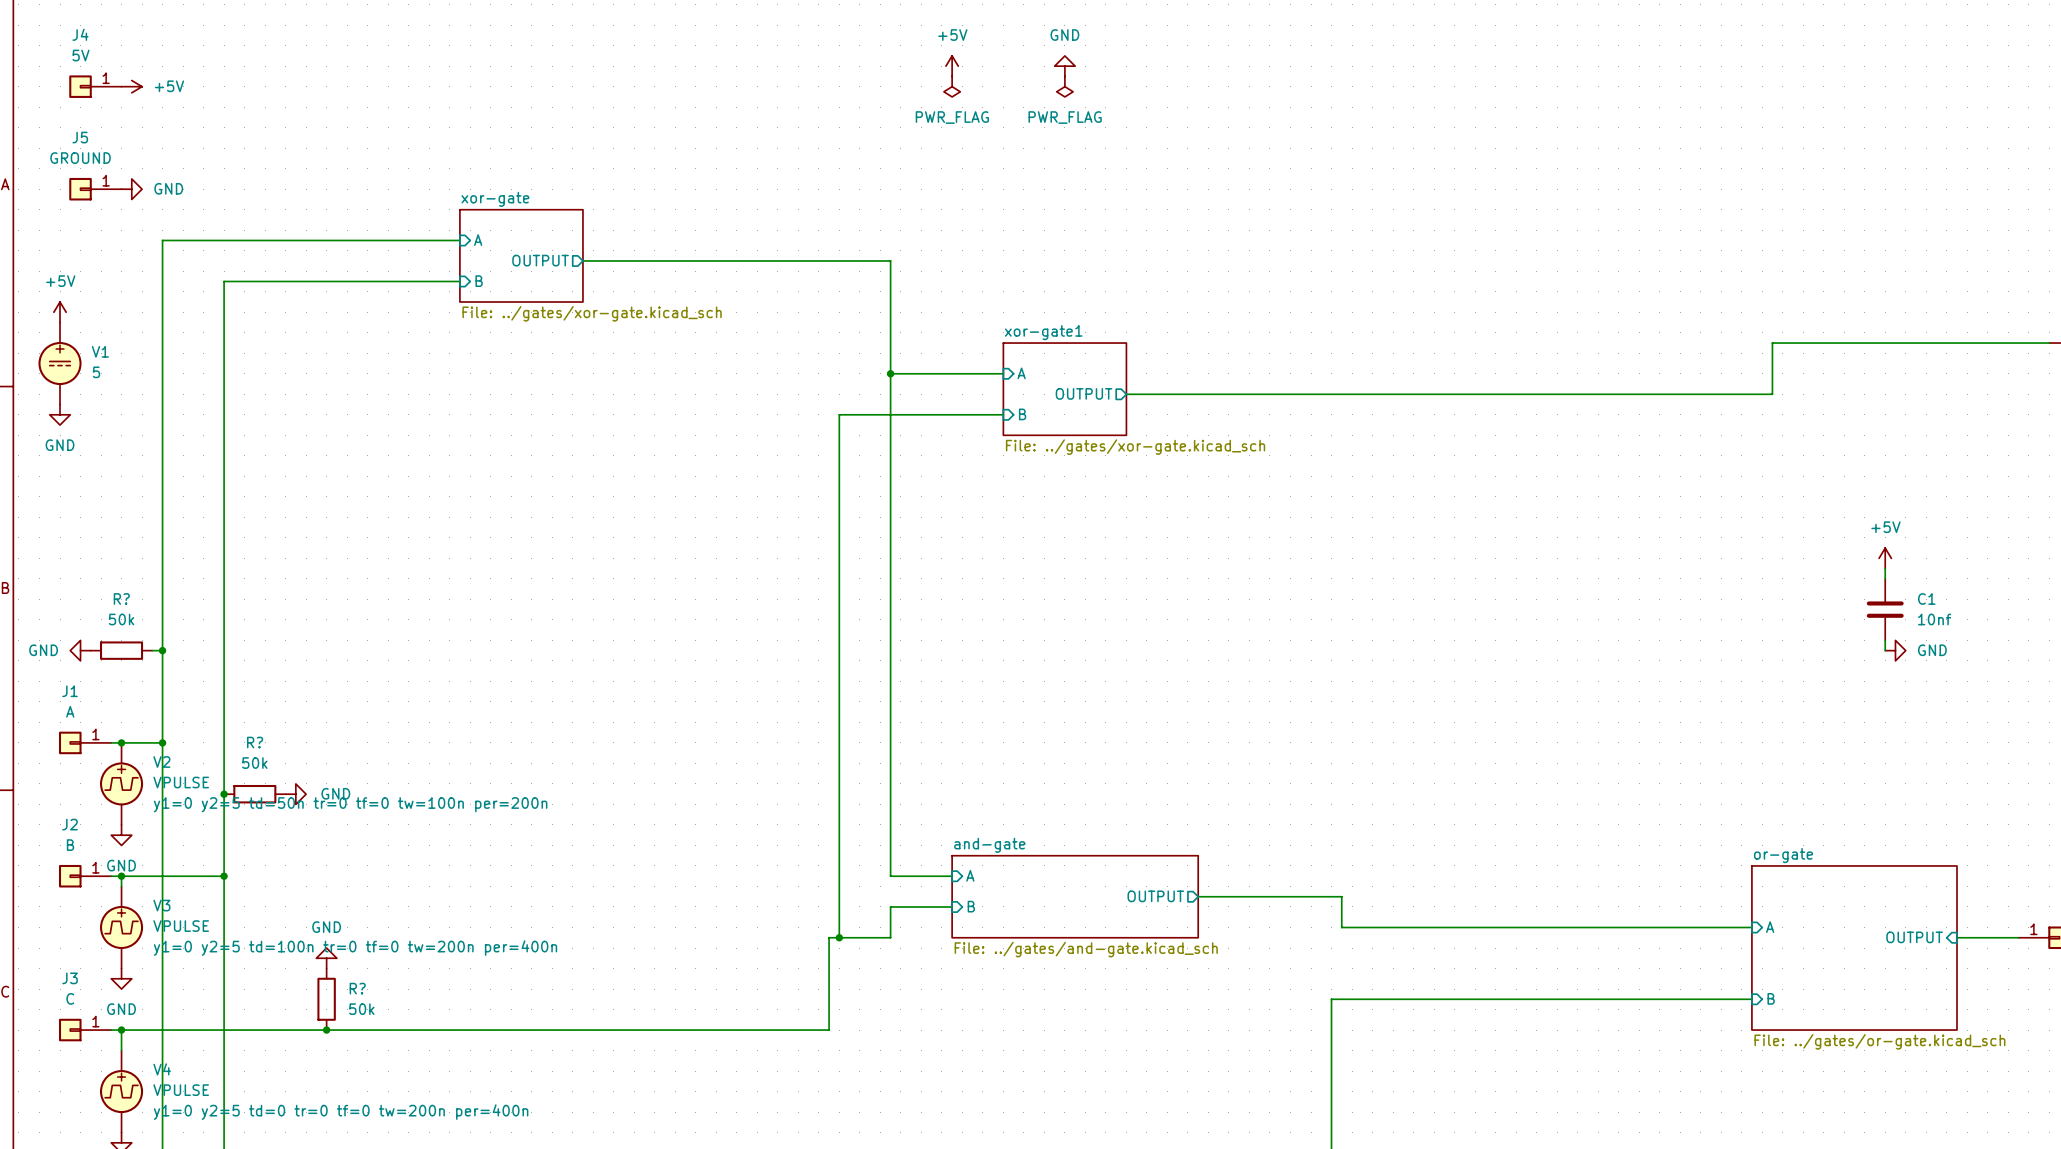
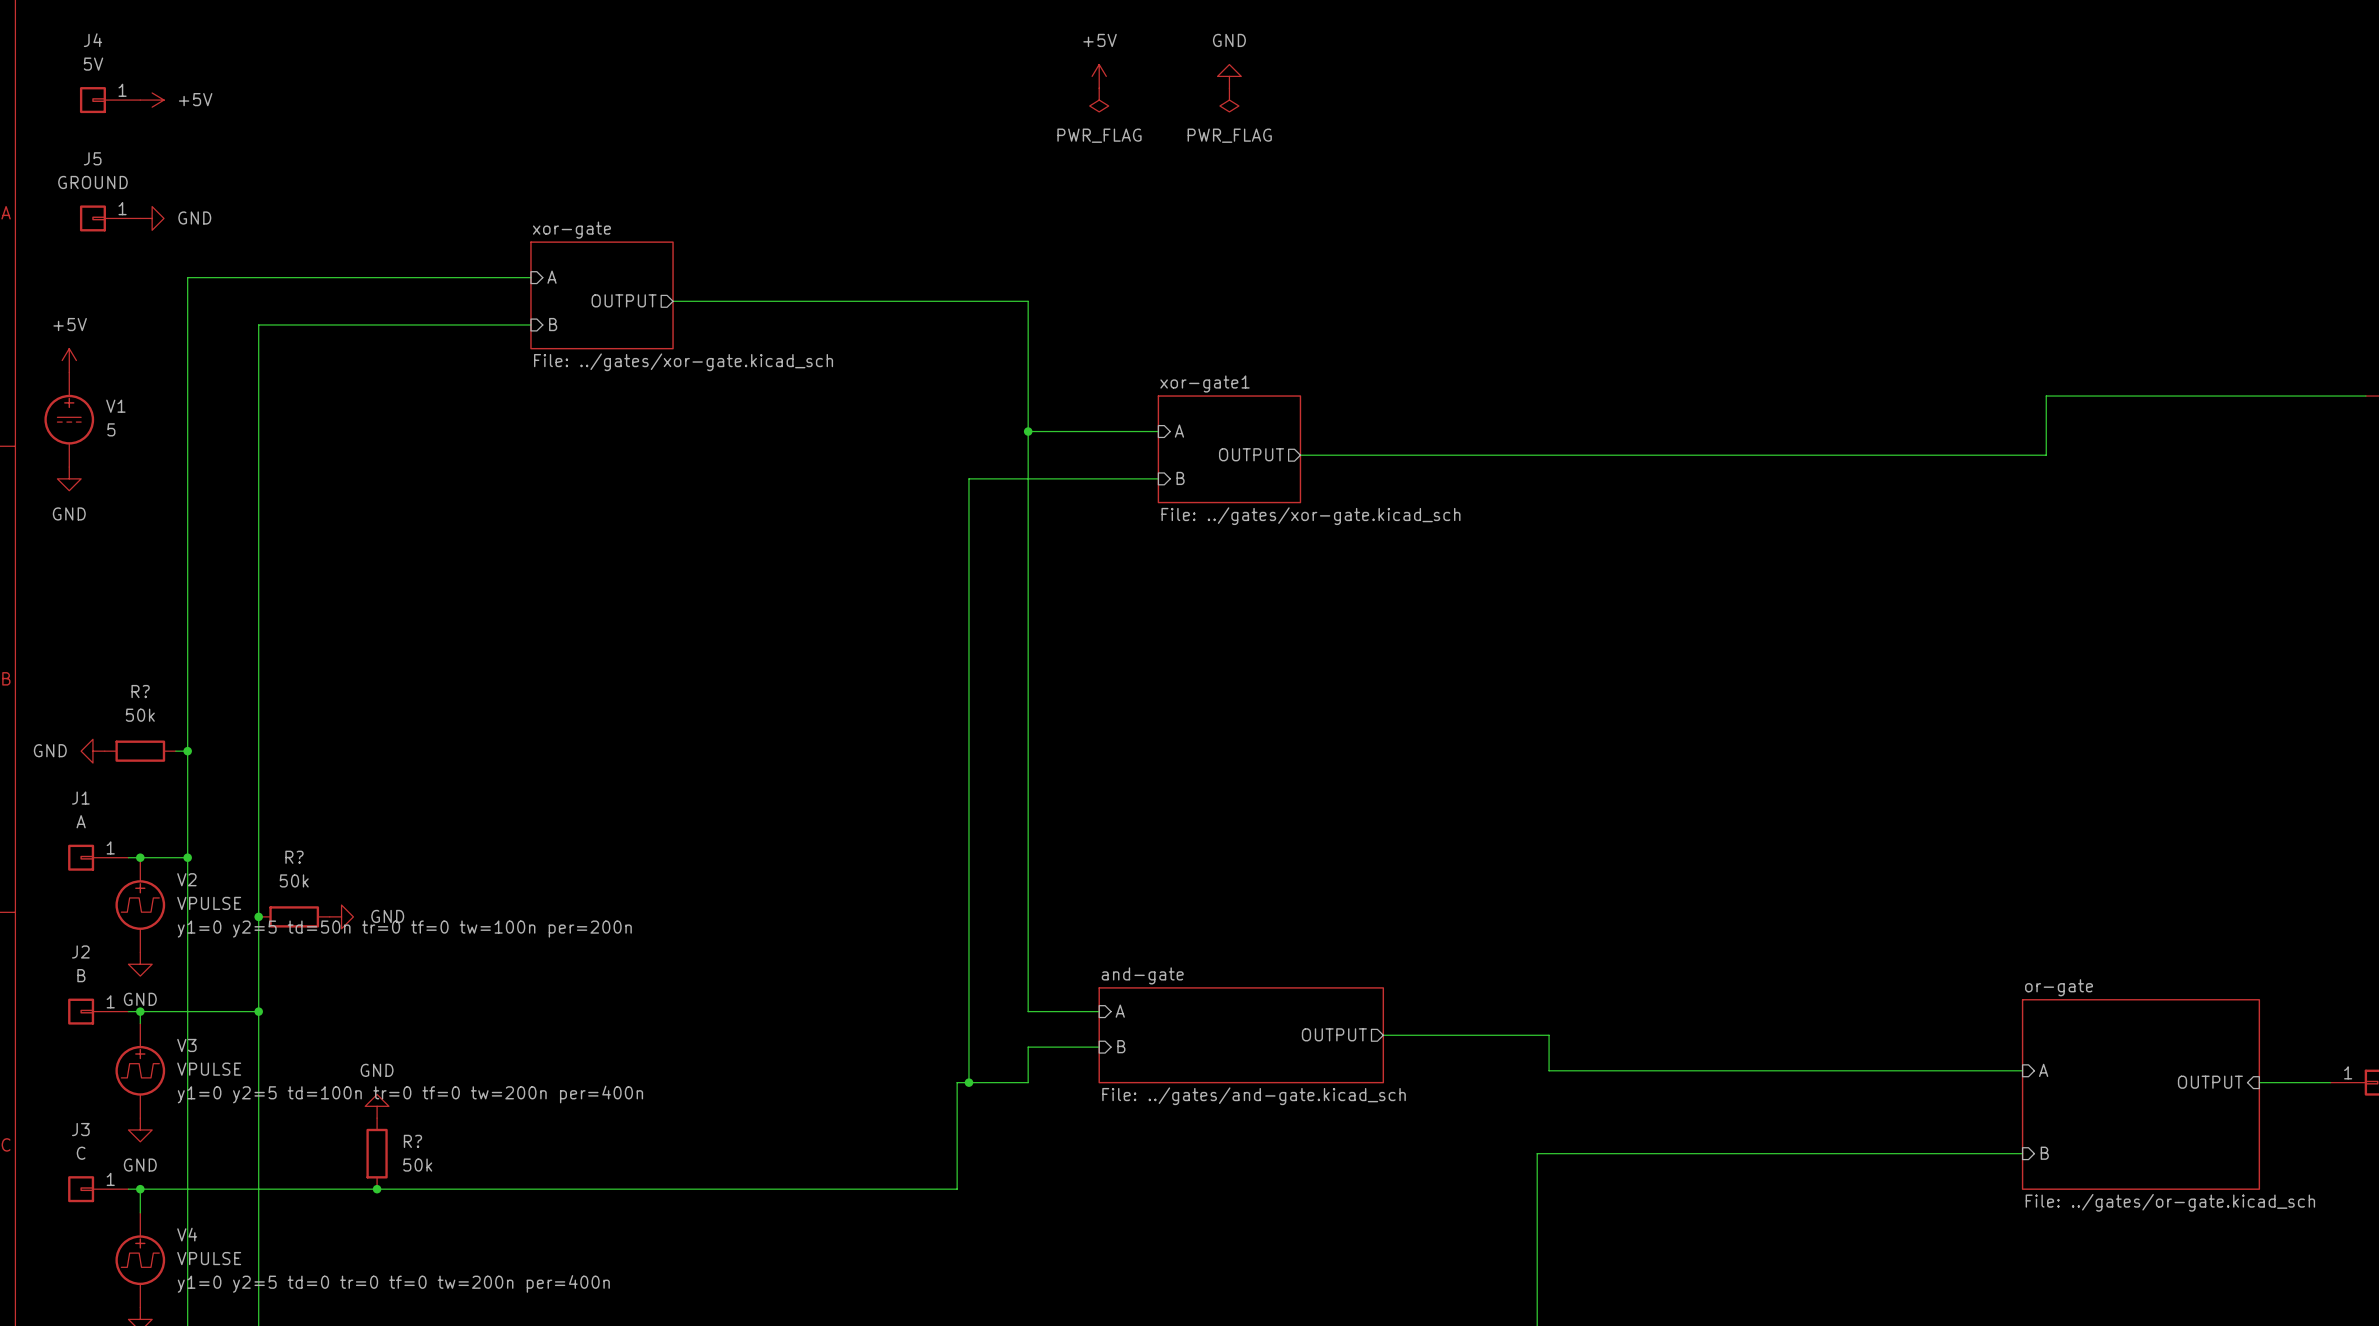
power symbol: +5V (1885, 558) -> none
wire: (1885, 568) (1885, 578) -> none
C1: 10nf (1885, 609) -> none
wire: (1885, 640) (1885, 650) -> none
power symbol: GND (1895, 650) -> none

